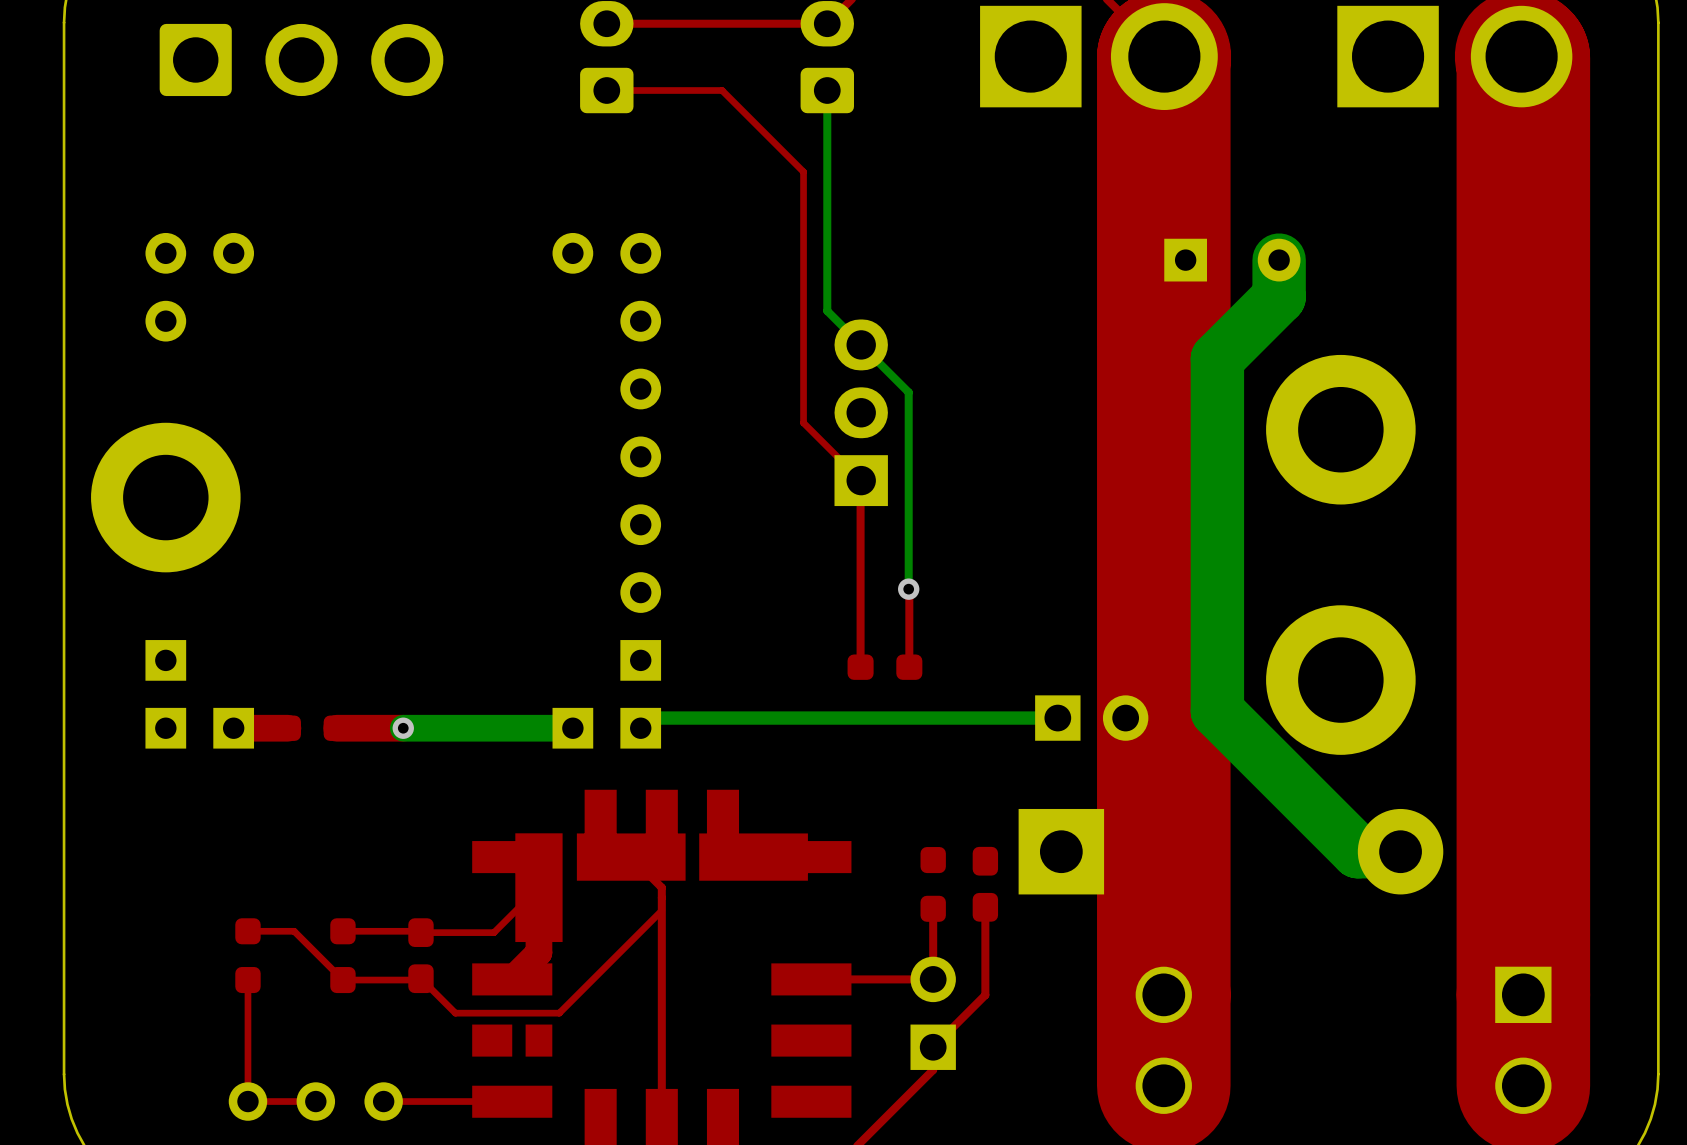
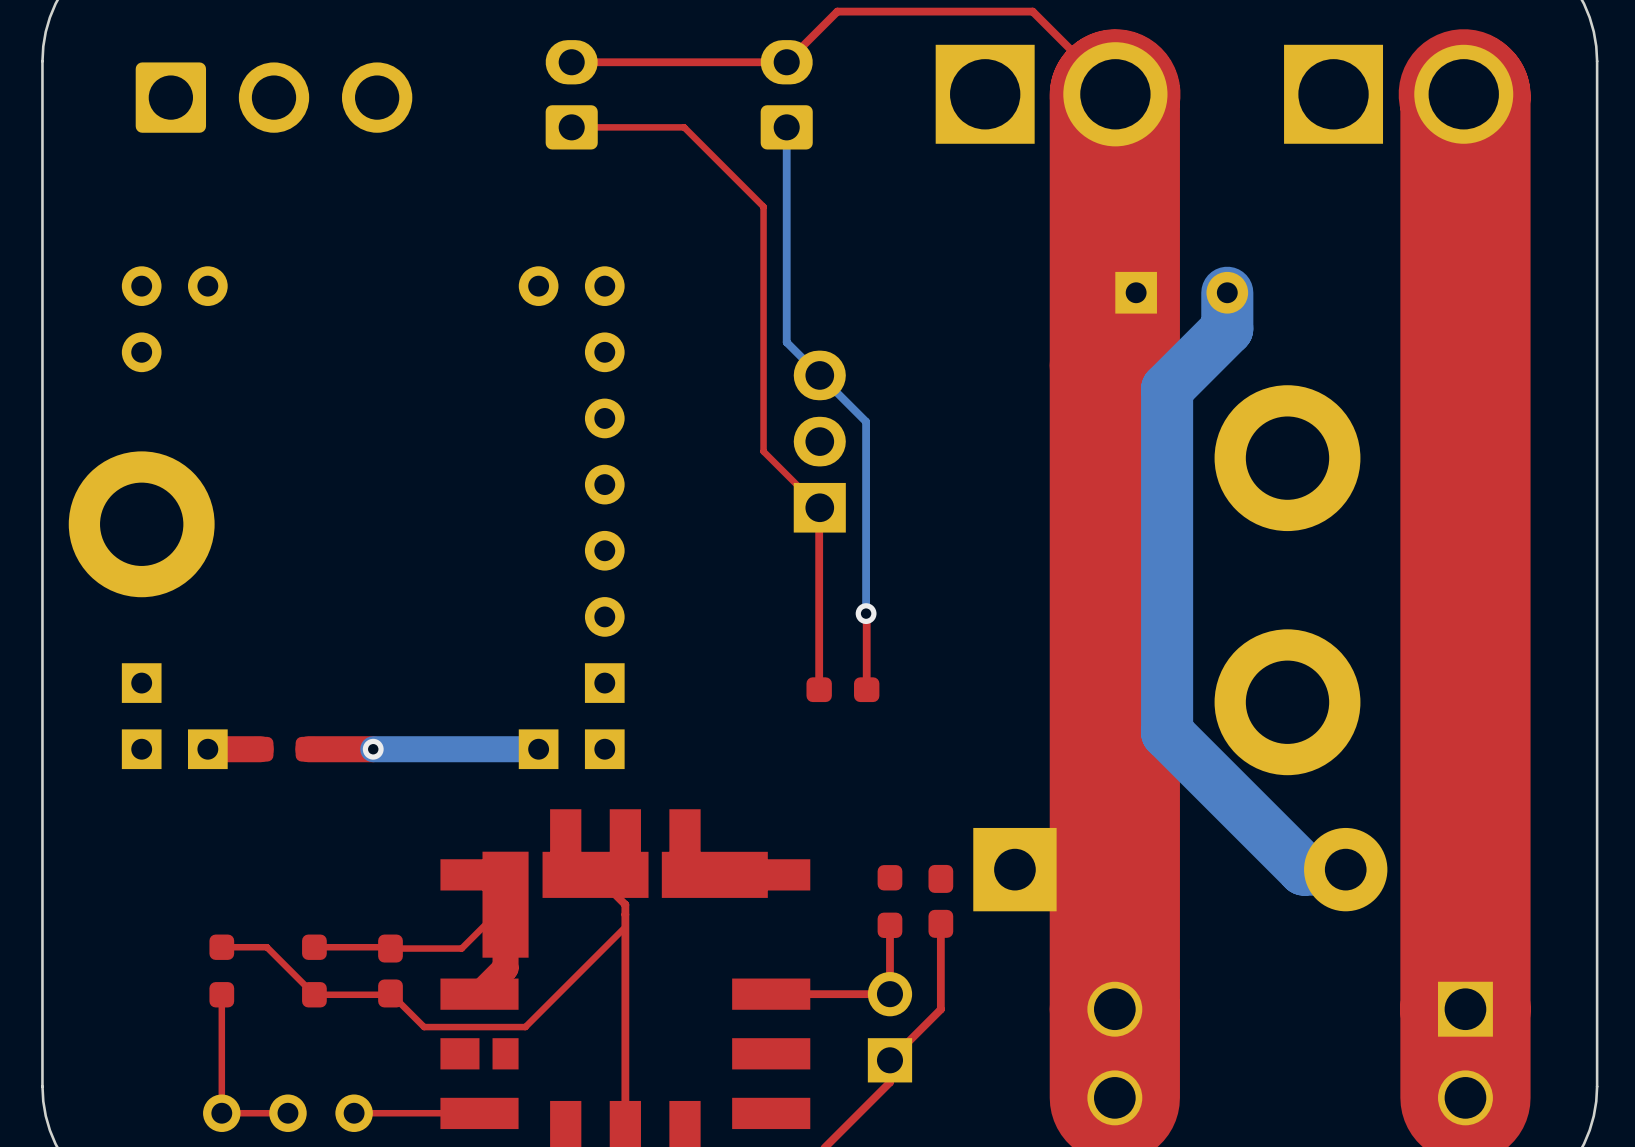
bottom track: (1057, 718) (650, 718) (640, 728) -> none
part: (1091, 718) -> none

